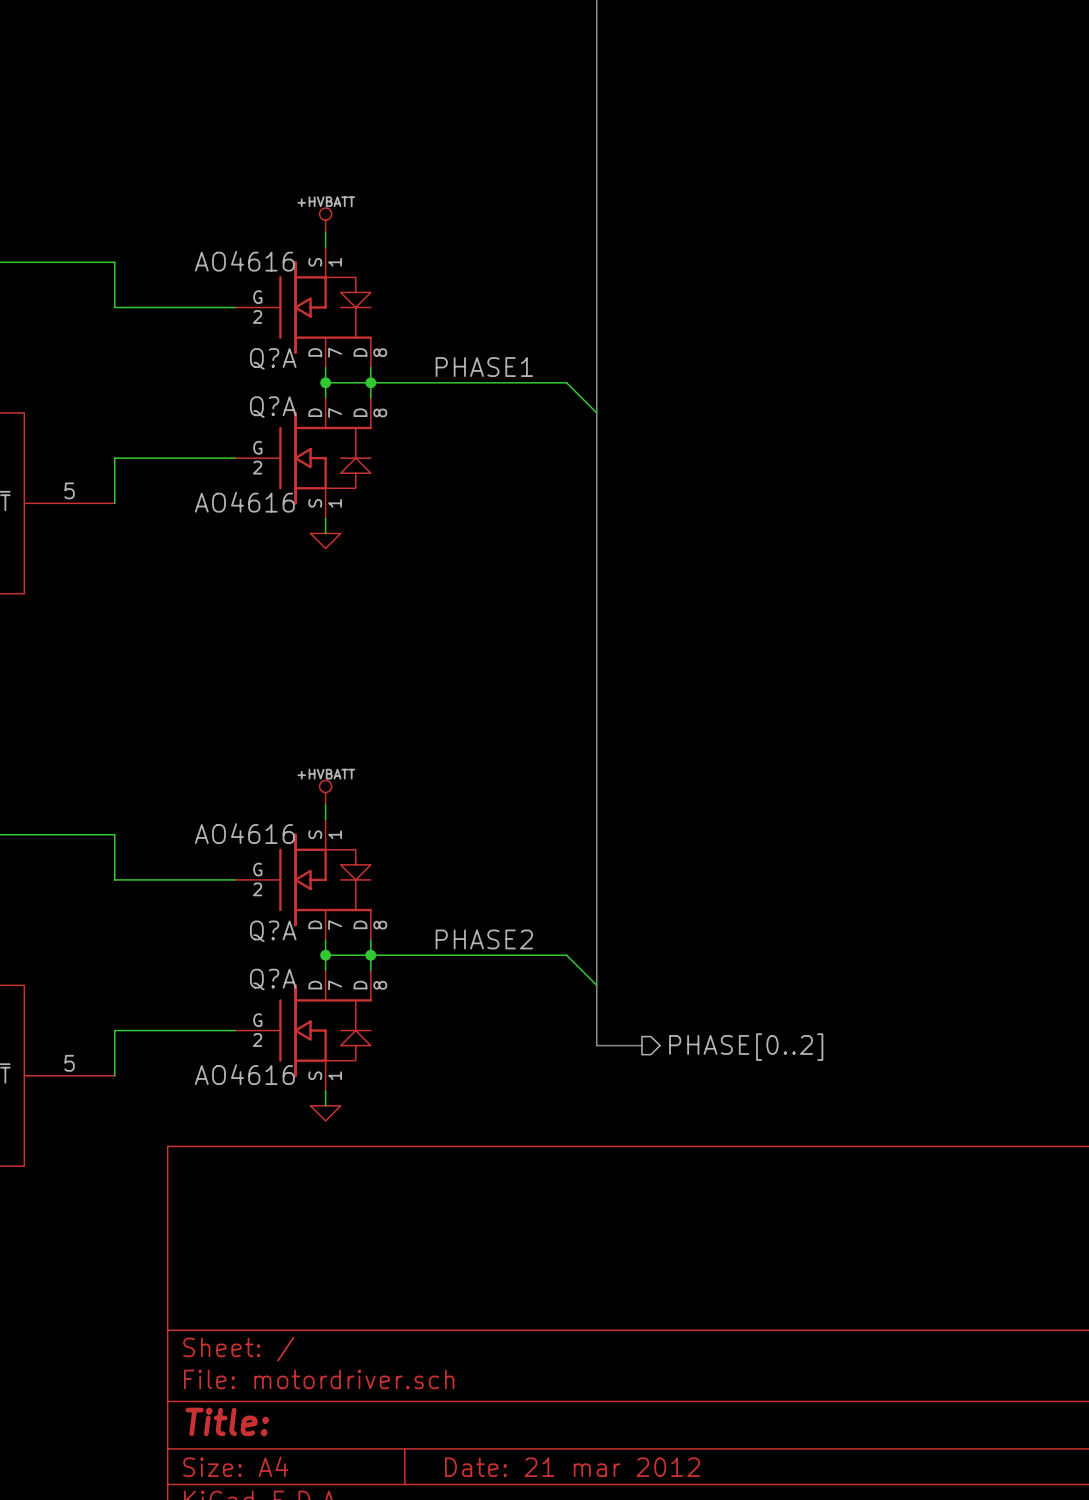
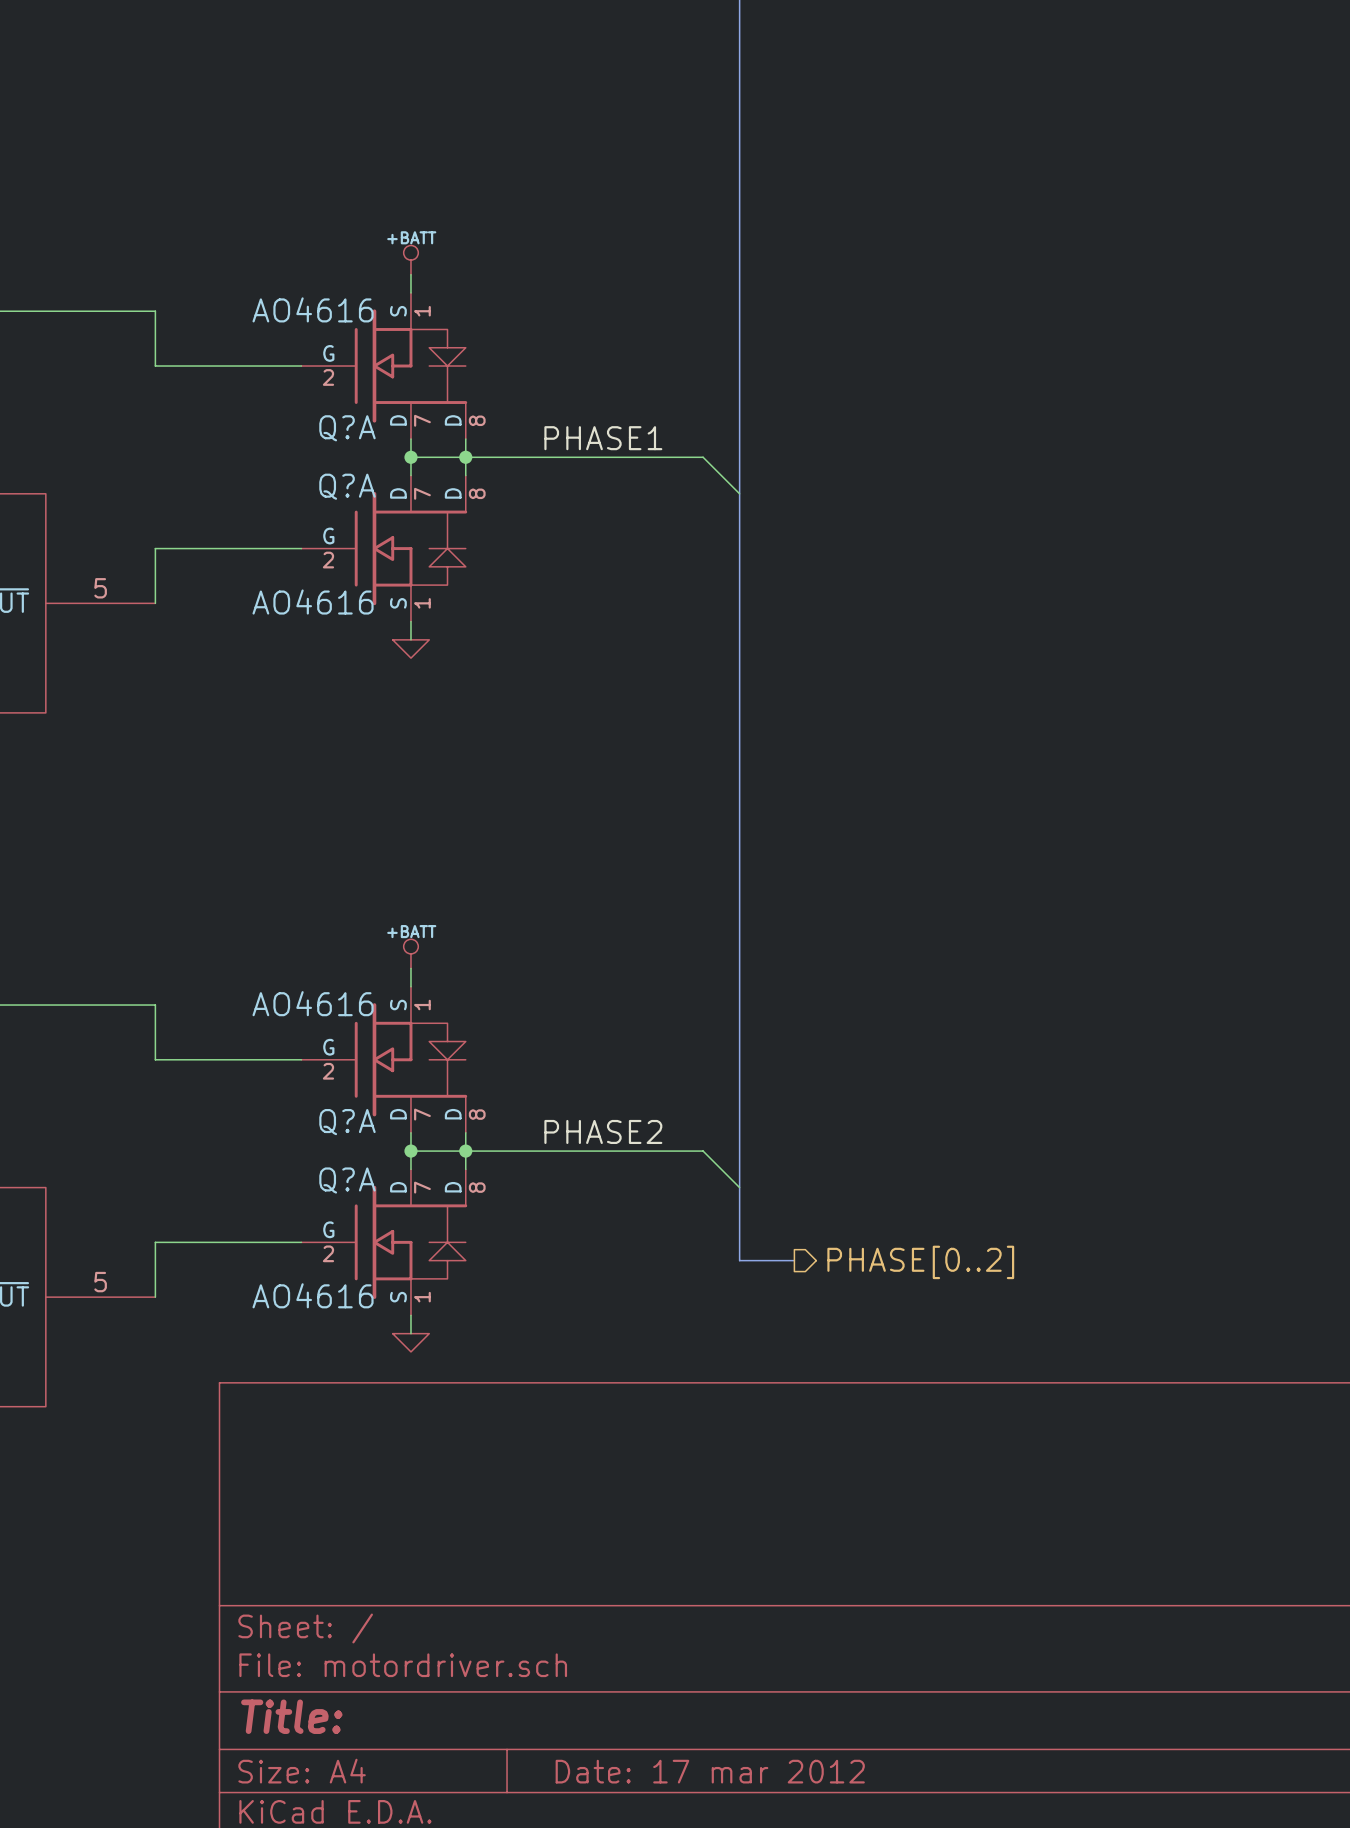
power symbol: +HVBATT (325, 220) -> +BATT (410, 260)
power symbol: +HVBATT (325, 792) -> +BATT (410, 953)
title block: Date: 21 mar 2012 (572, 1467) -> Date: 17 mar 2012 (710, 1771)

